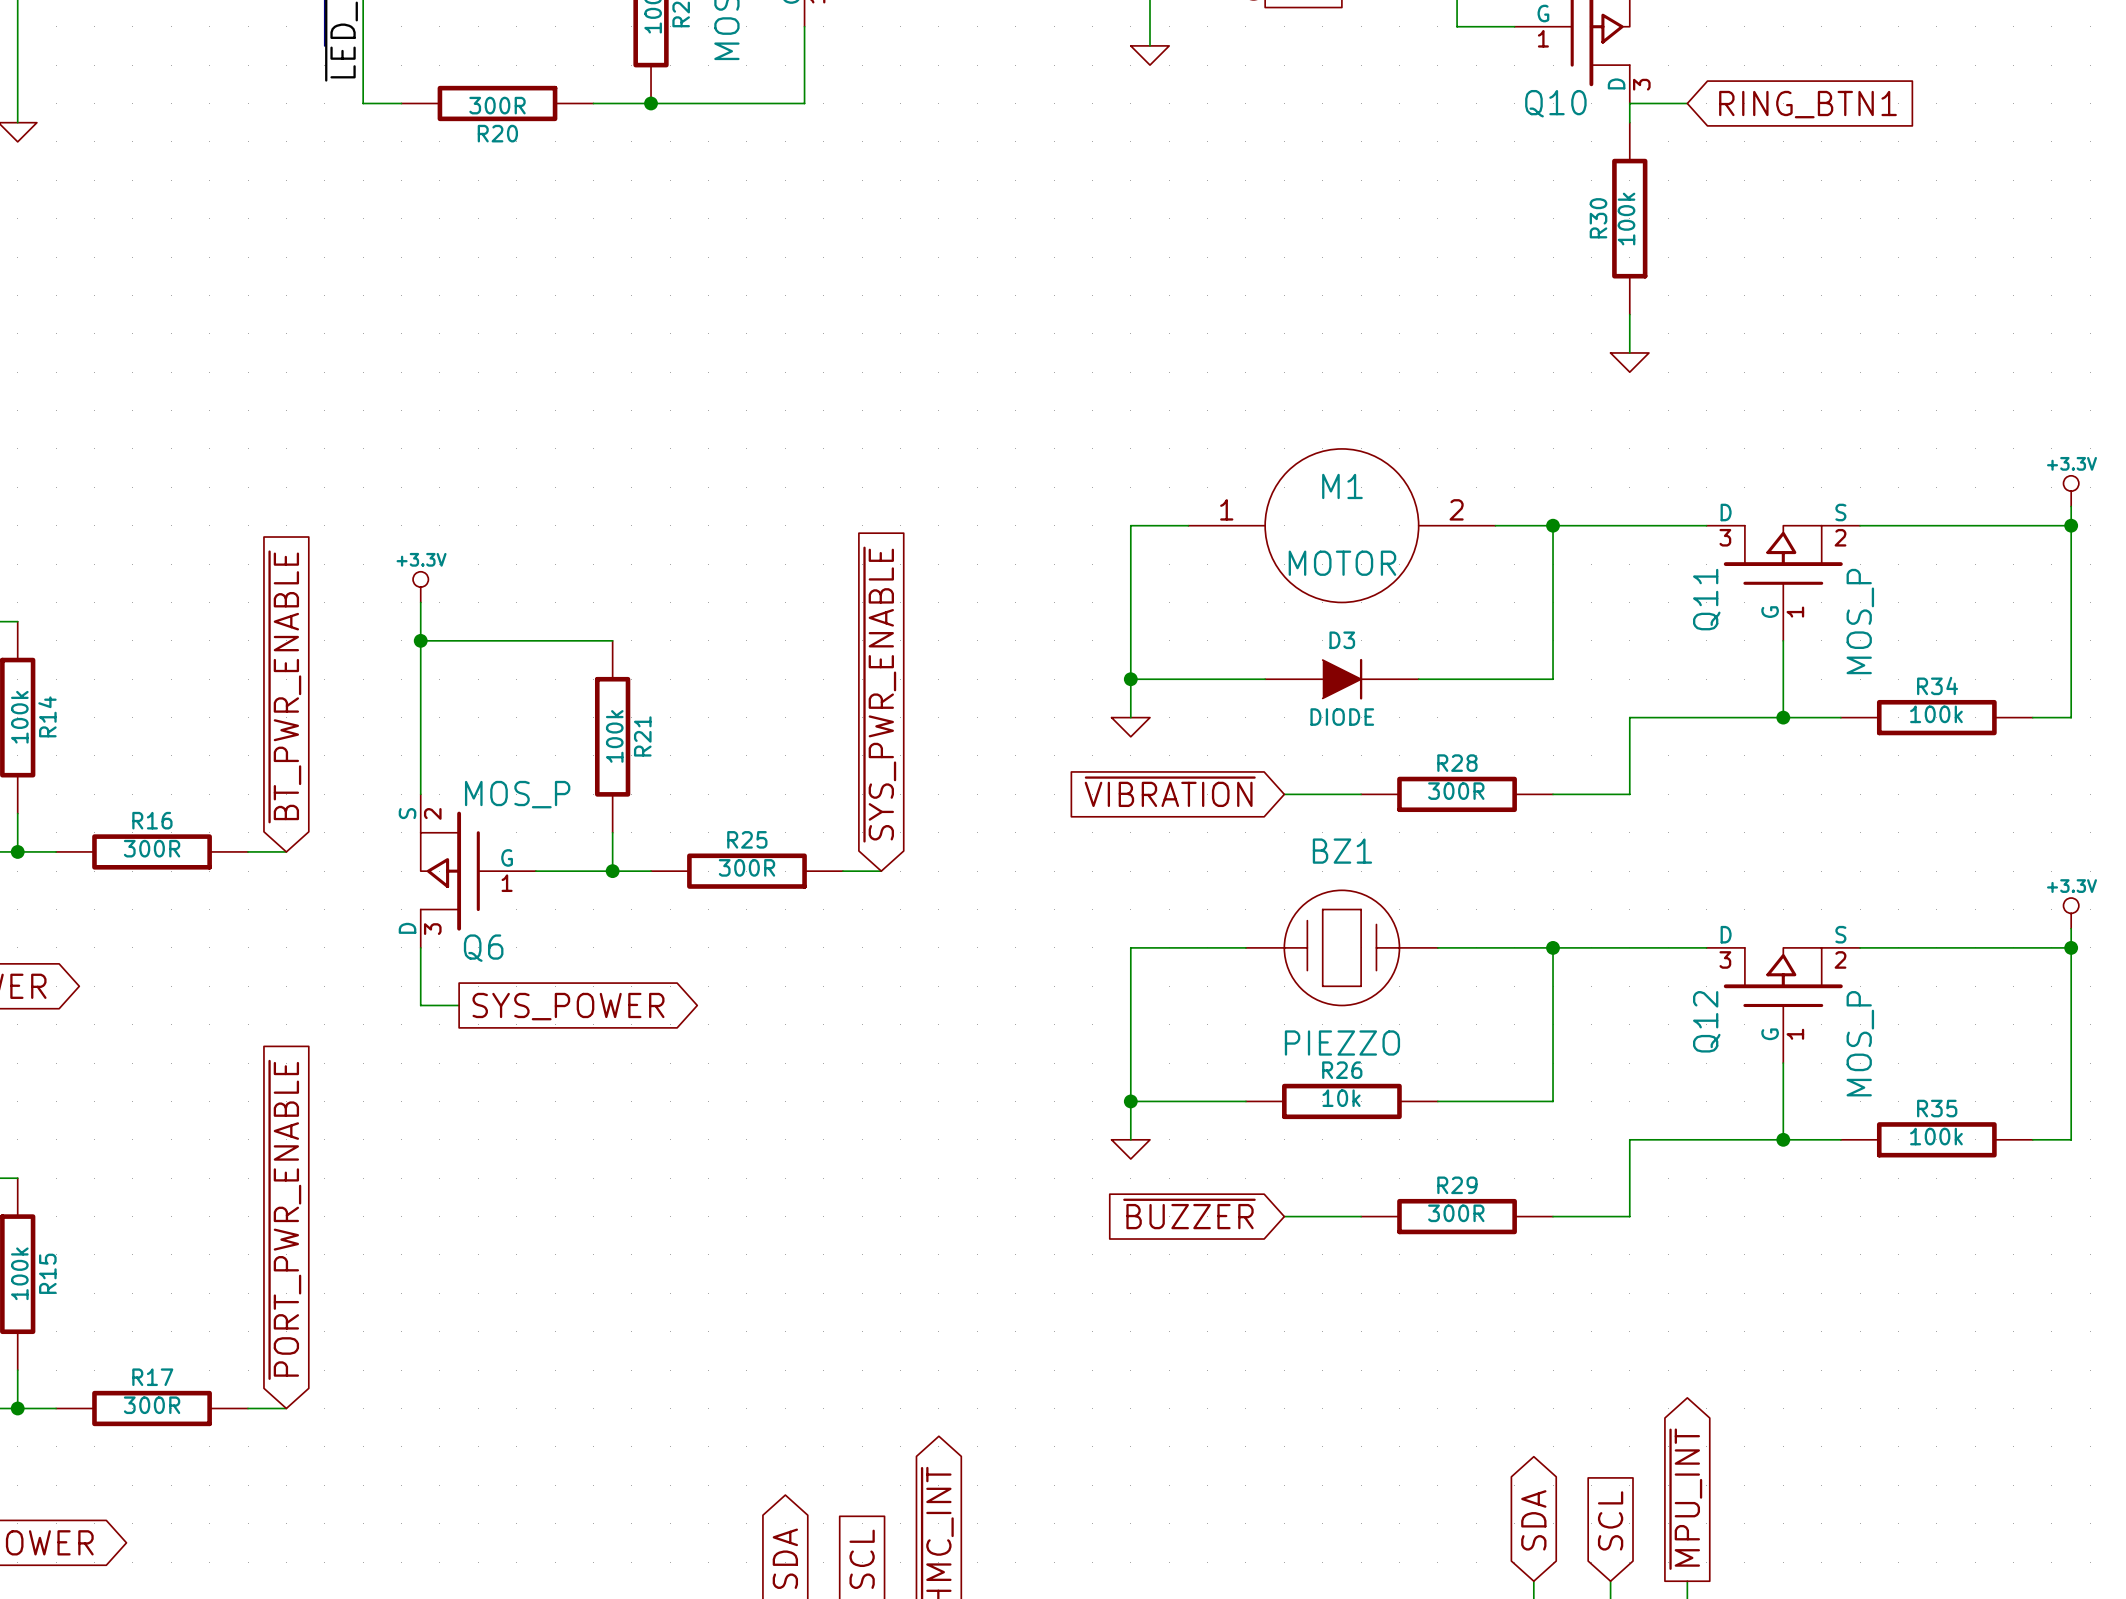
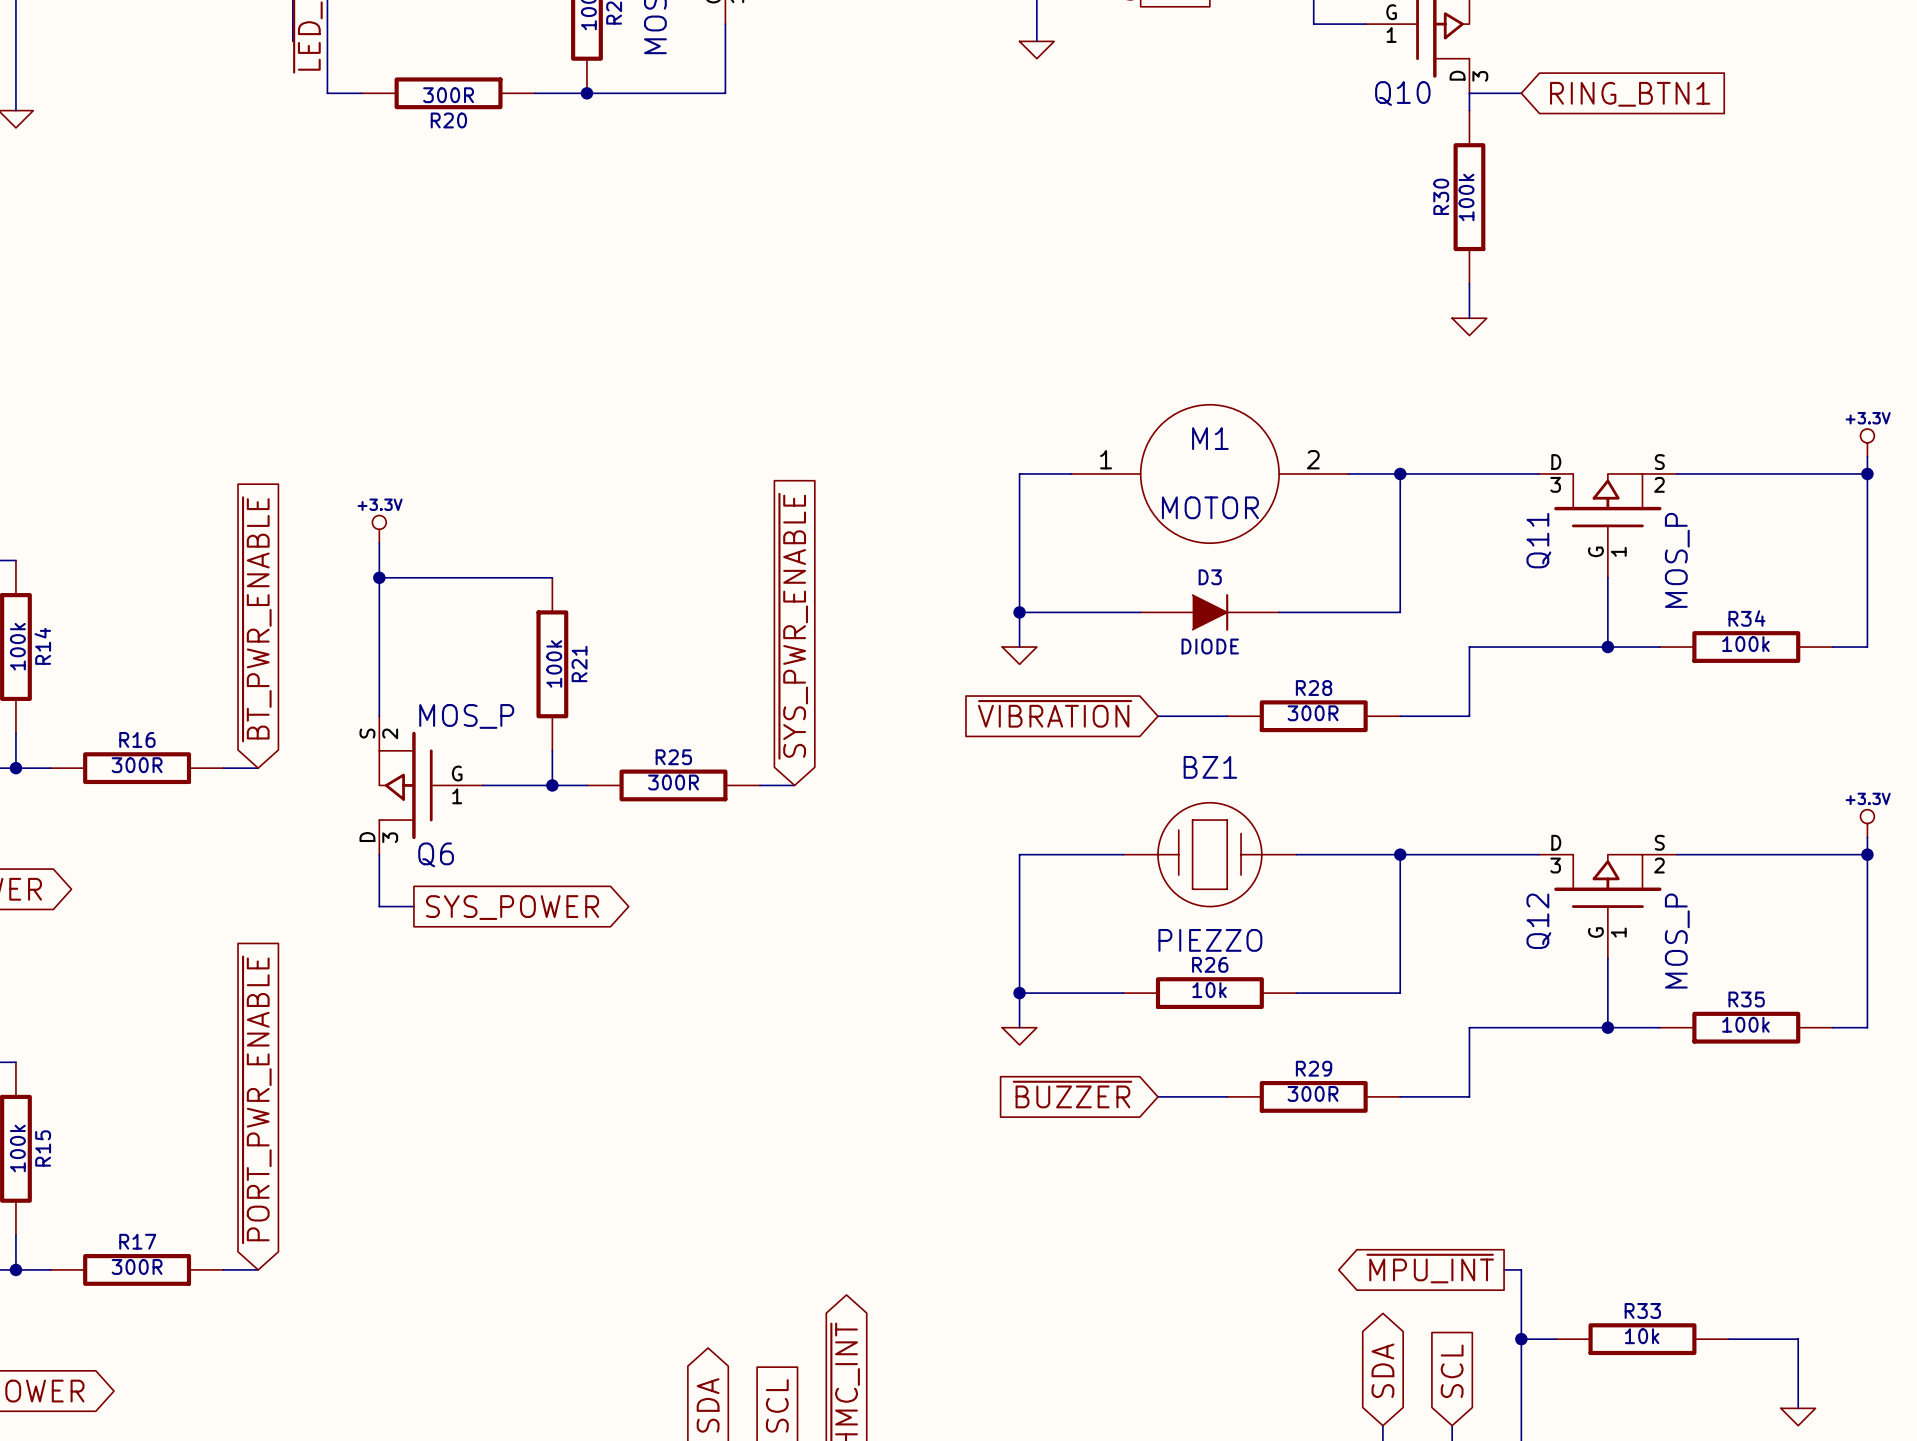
wire: none -> (1504, 1269) (1521, 1269) (1521, 1425)
wire: none -> (1521, 1339) (1555, 1339)
junction: none -> (1521, 1339)
R33: none -> 10k (1642, 1339)
wire: none -> (1728, 1339) (1798, 1339) (1798, 1408)
global label rotation: 0° (1685, 1499) -> 90° counterclockwise (1430, 1268)
power symbol: none -> (1798, 1417)

